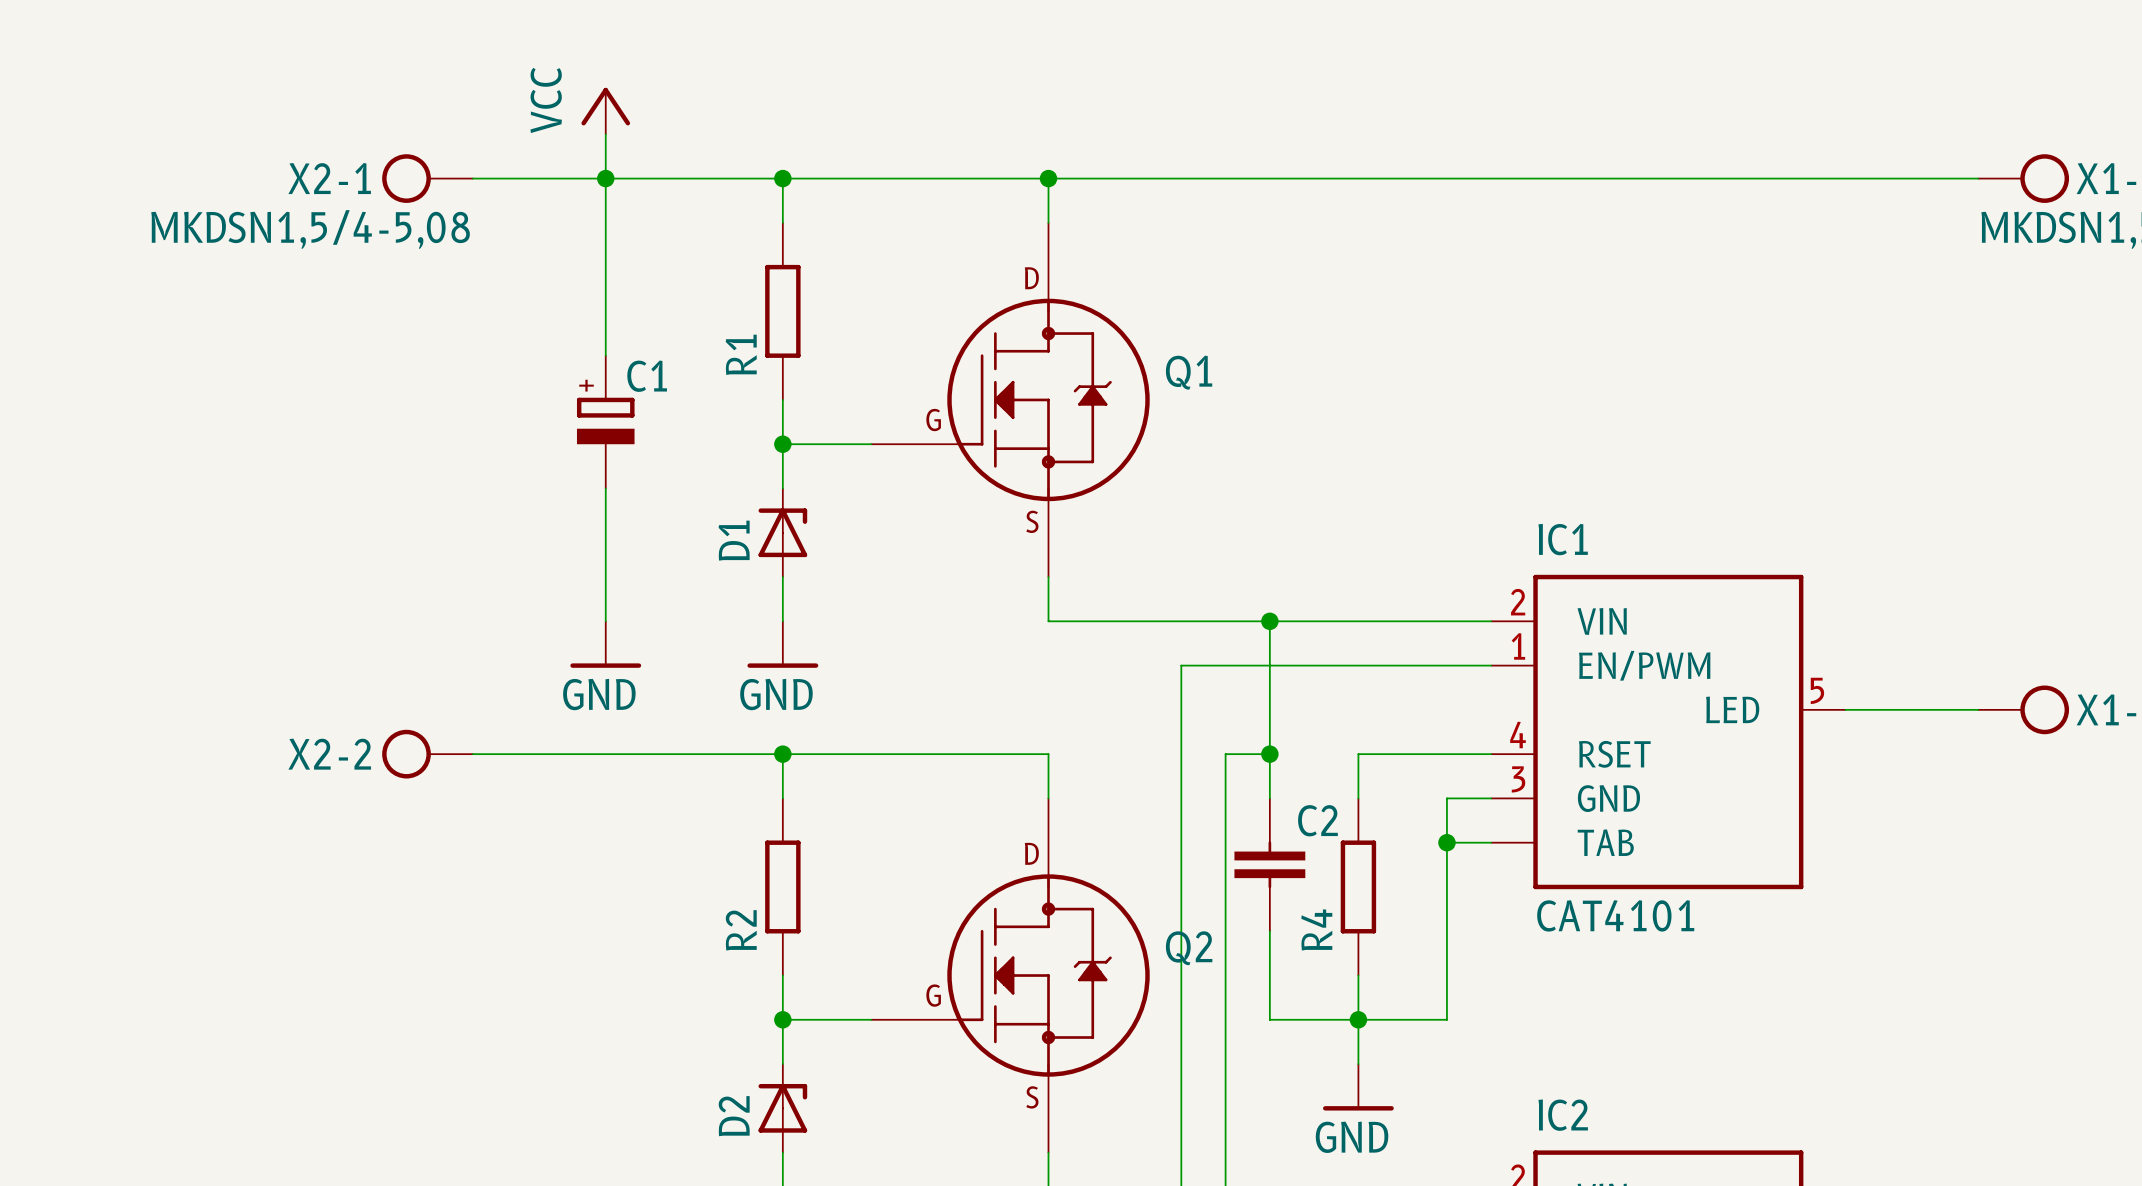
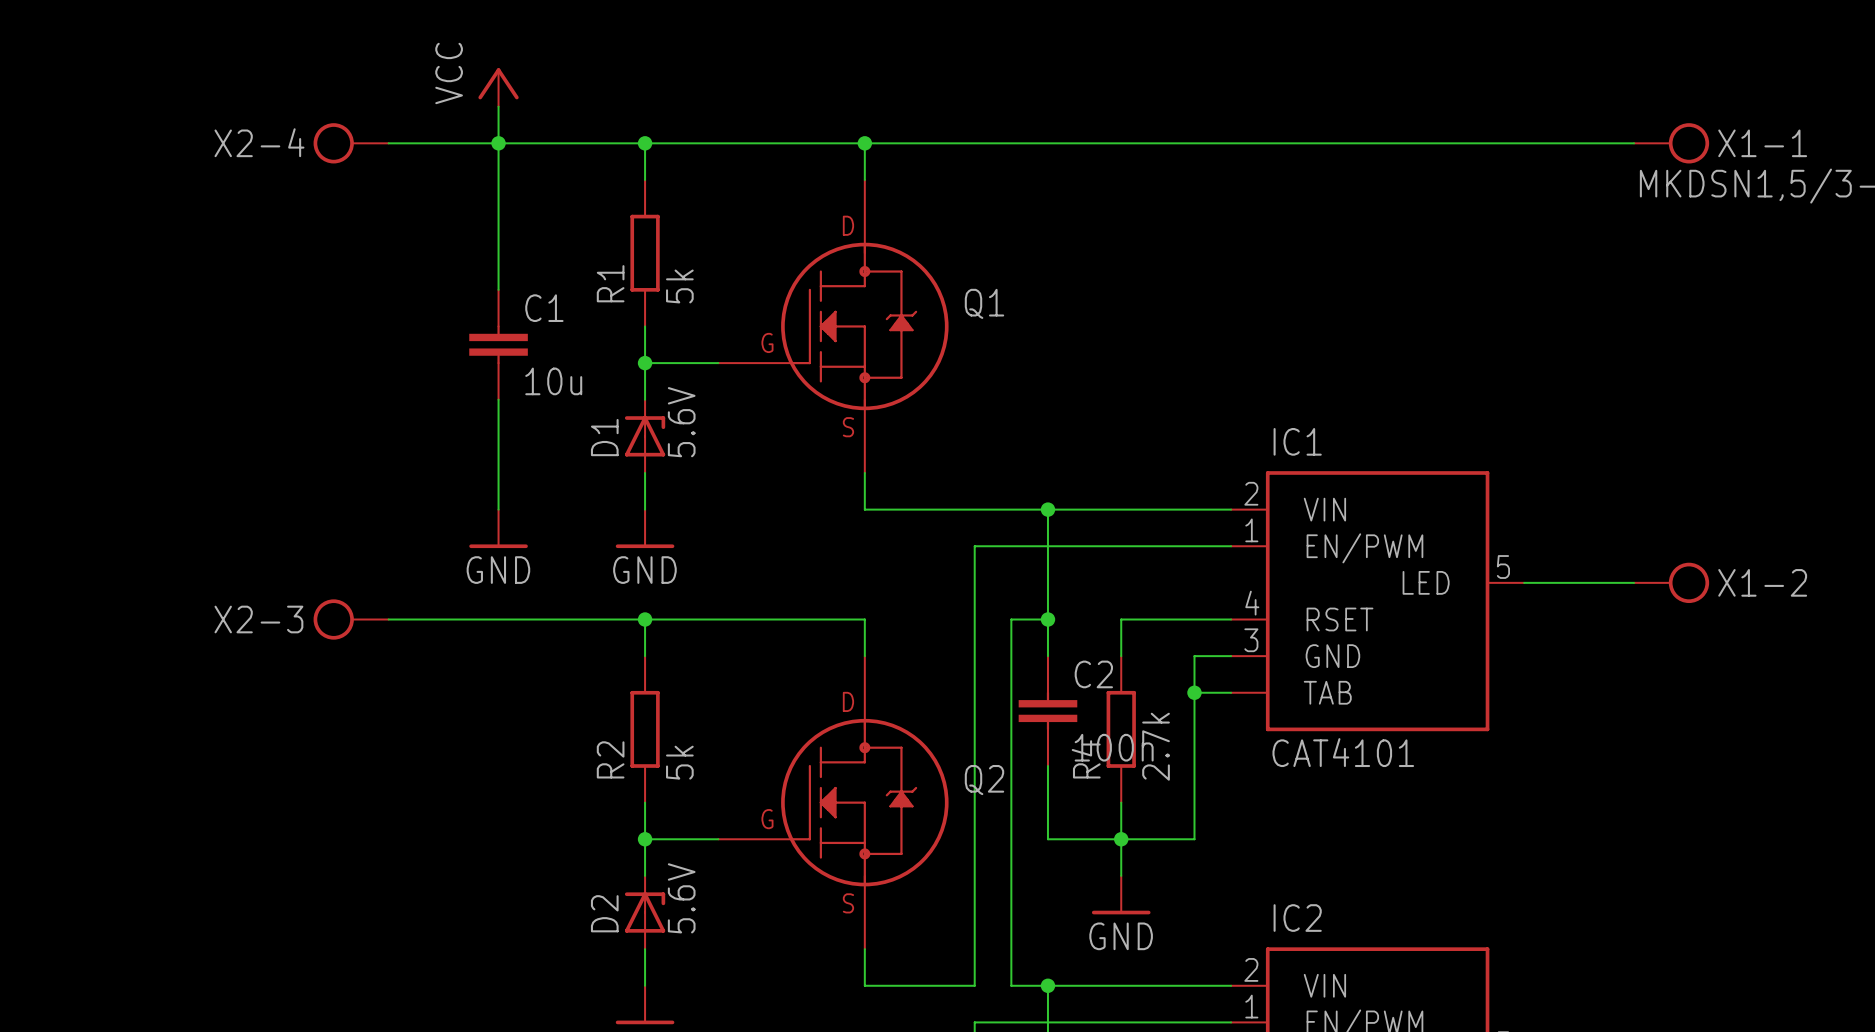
X2-1 name: X2-1 (329, 178) -> X2-4 (259, 142)
X2-1 value: MKDSN1,5/4-5,08 (310, 229) -> none
R1 value: none -> 5k (679, 286)
C1 symbol: [576, 355, 635, 489] -> [469, 289, 528, 400]
C1 value: none -> 10u (553, 381)
D1 value: none -> 5.6V (681, 422)
X2-2 name: X2-2 (329, 754) -> X2-3 (258, 619)
C2 value: none -> 100n (1114, 747)
R4 value: none -> 2.7k (1156, 746)
R2 value: none -> 5k (679, 762)
D2 value: none -> 5.6V (681, 898)

